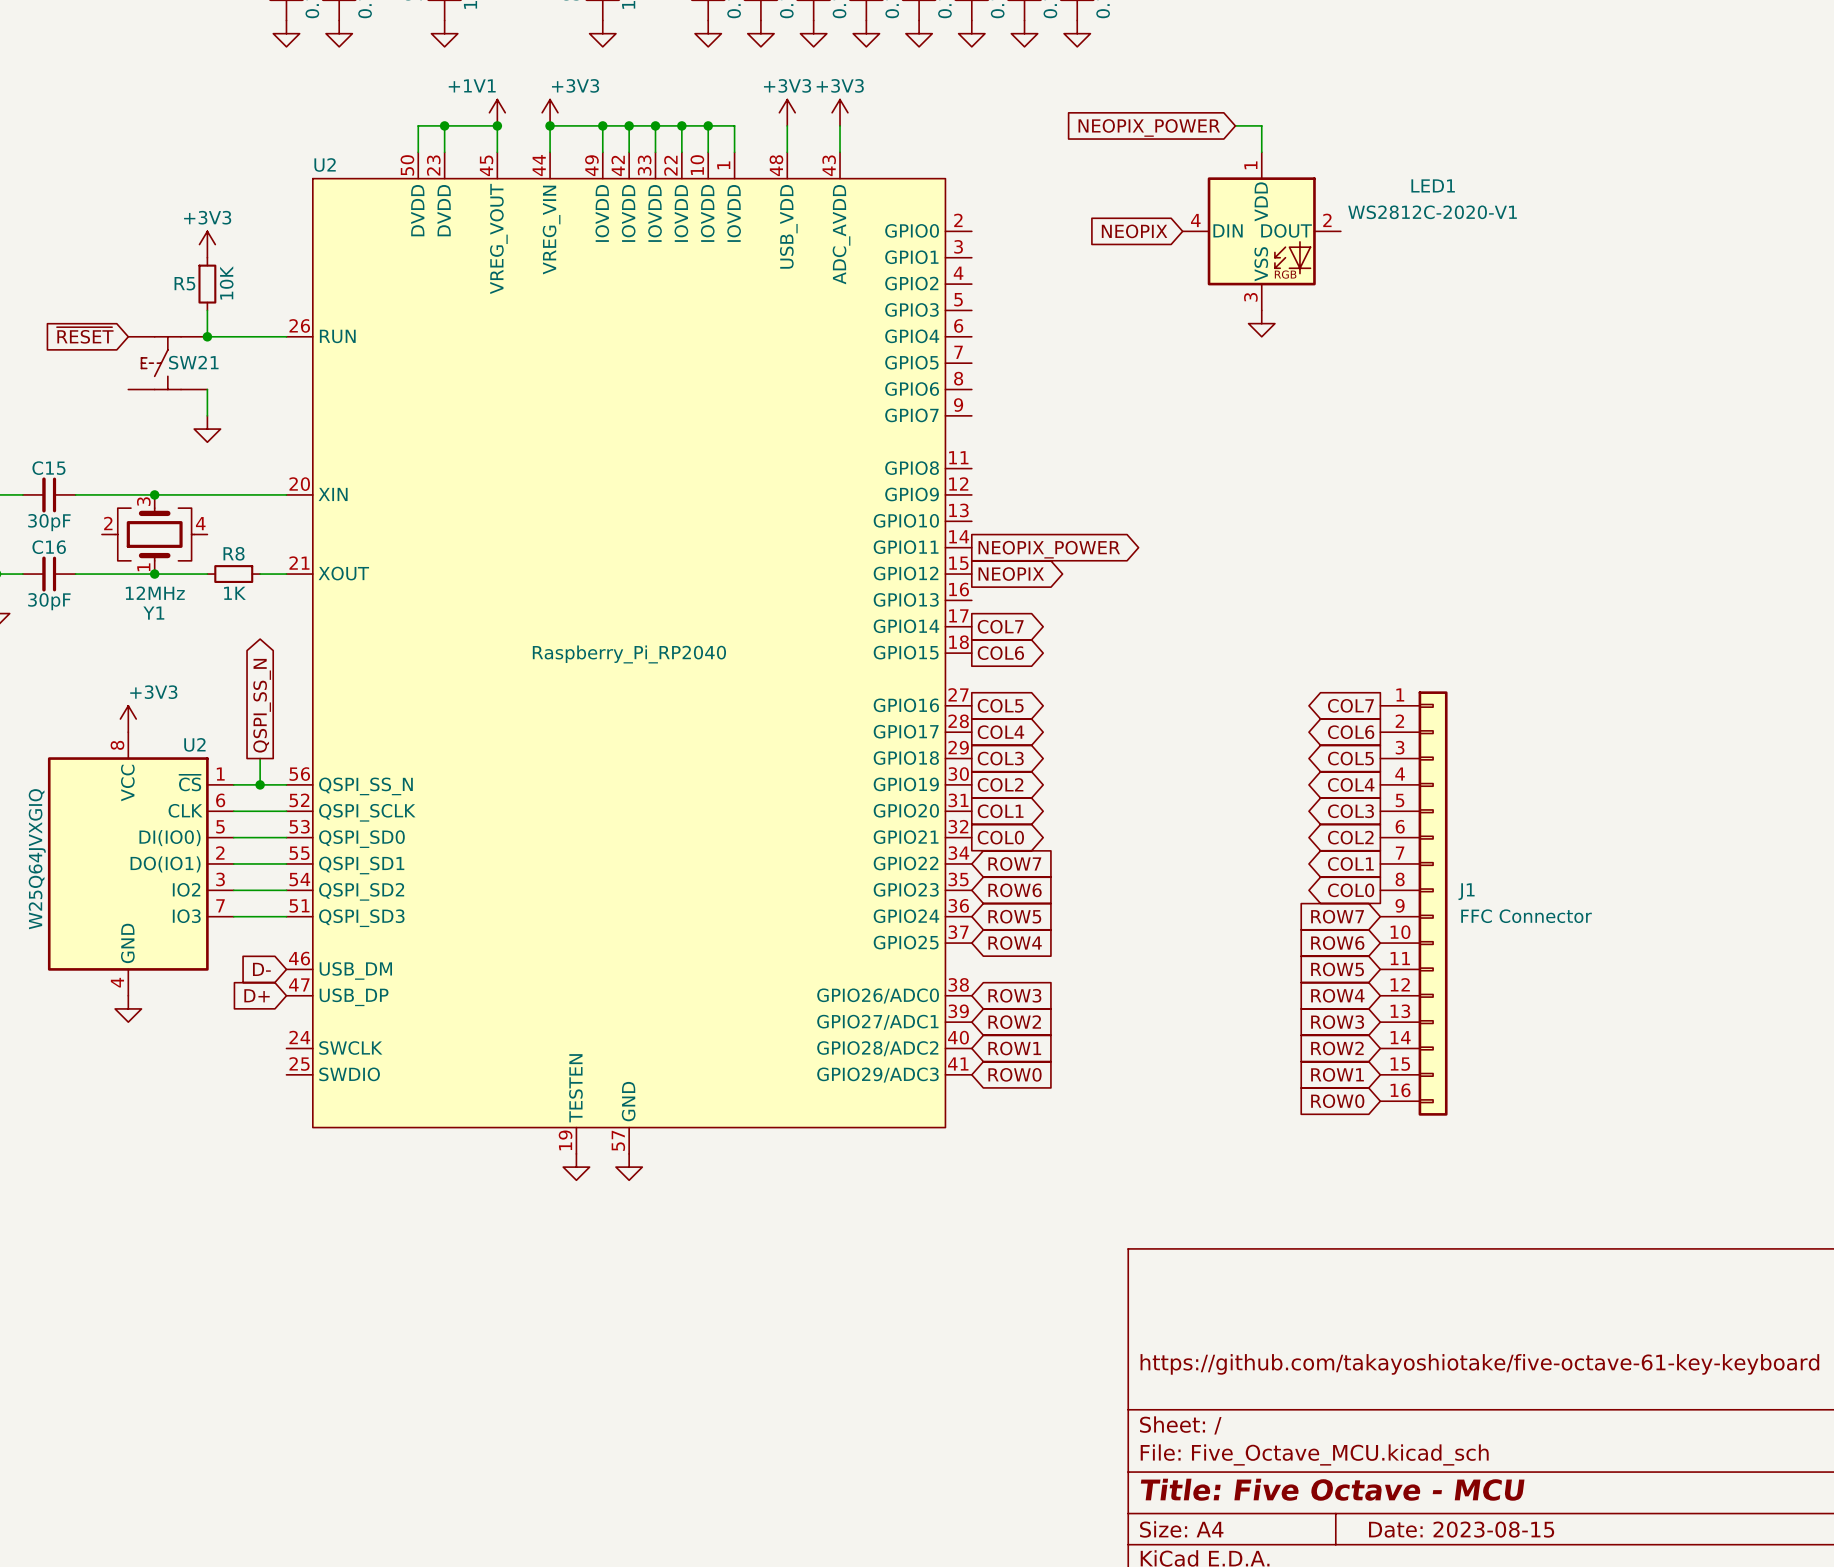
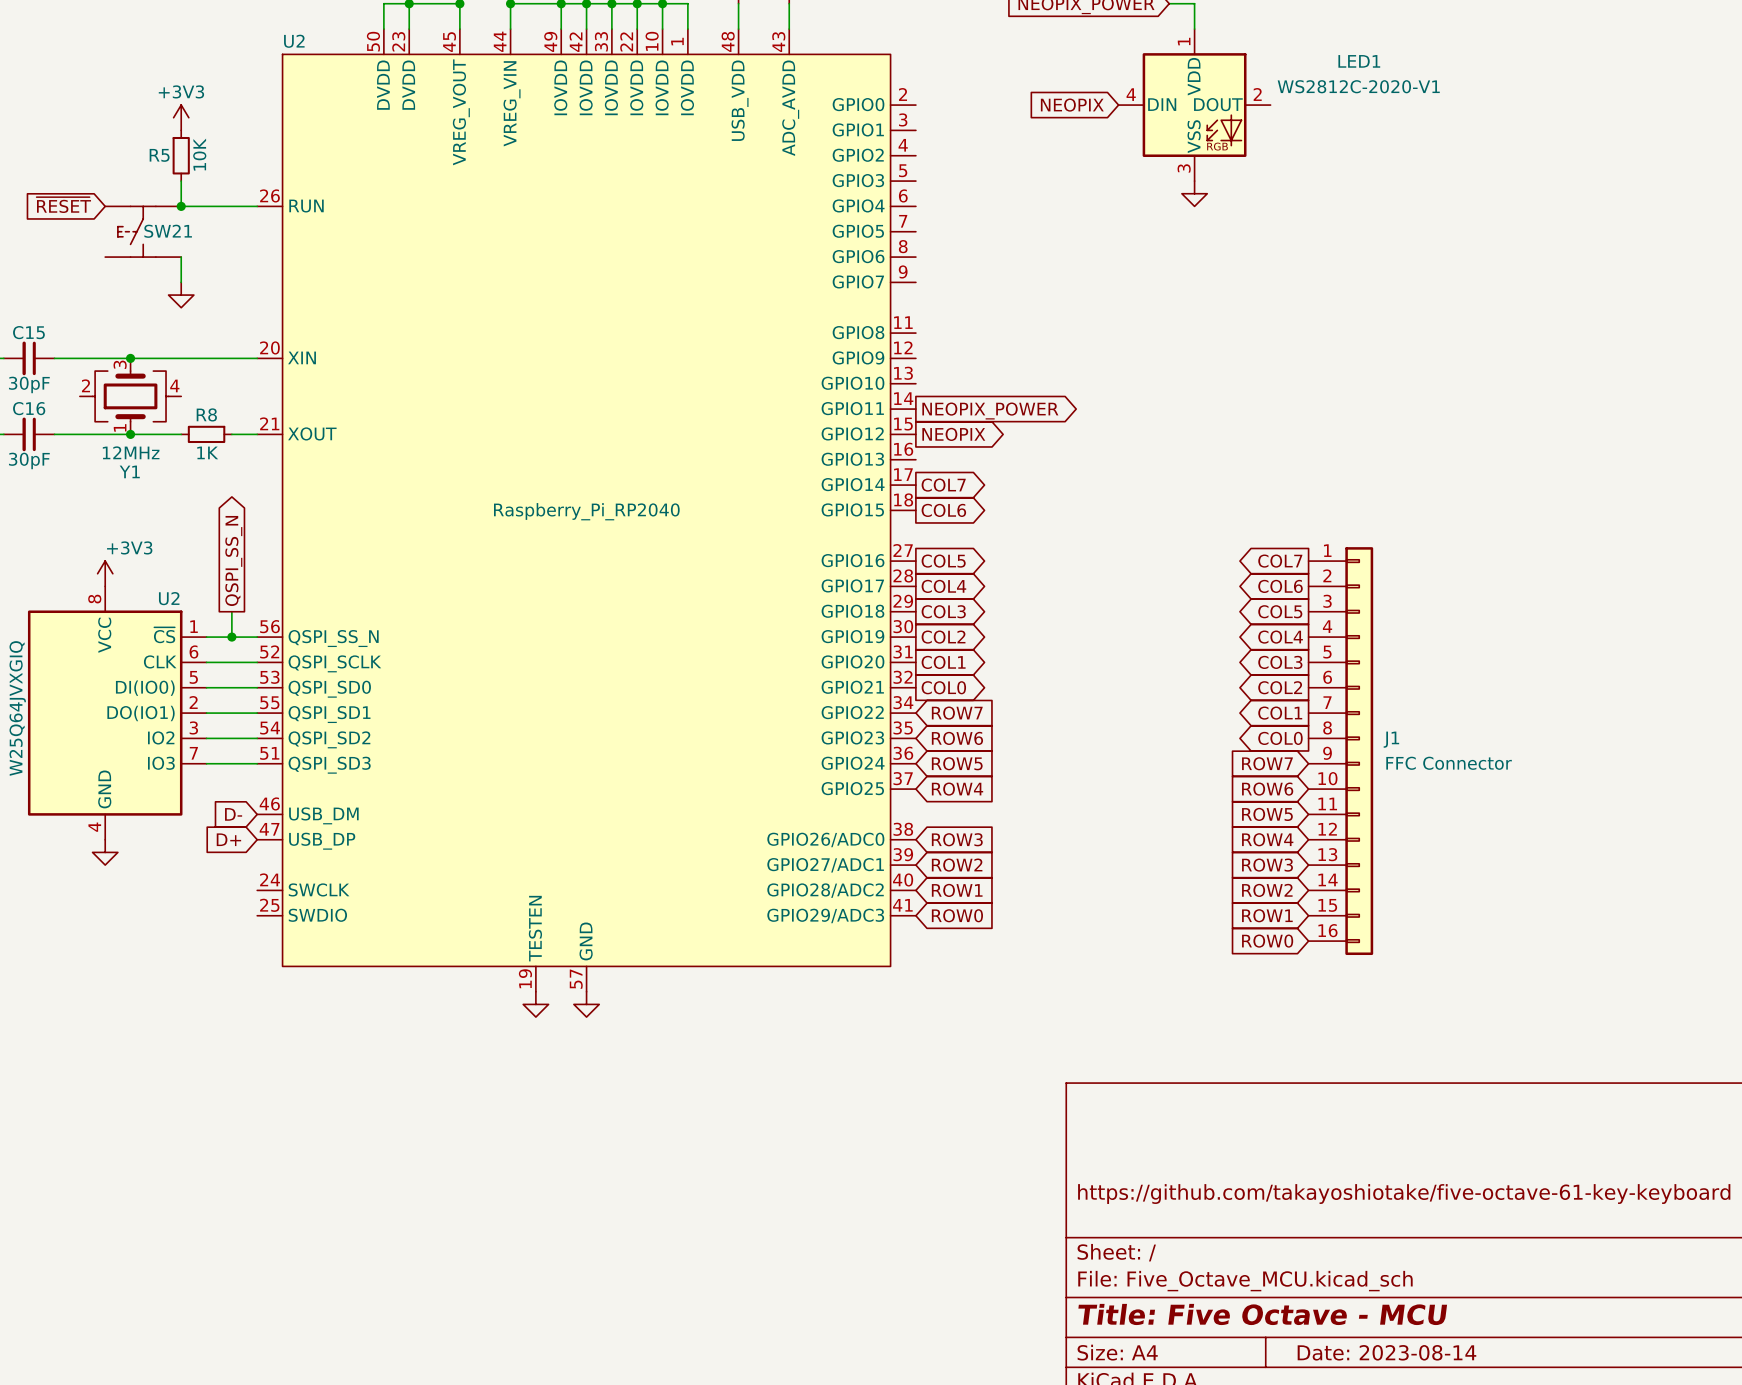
title block: Date: 2023-08-15 (1461, 1529) -> Date: 2023-08-14 (1386, 1352)

